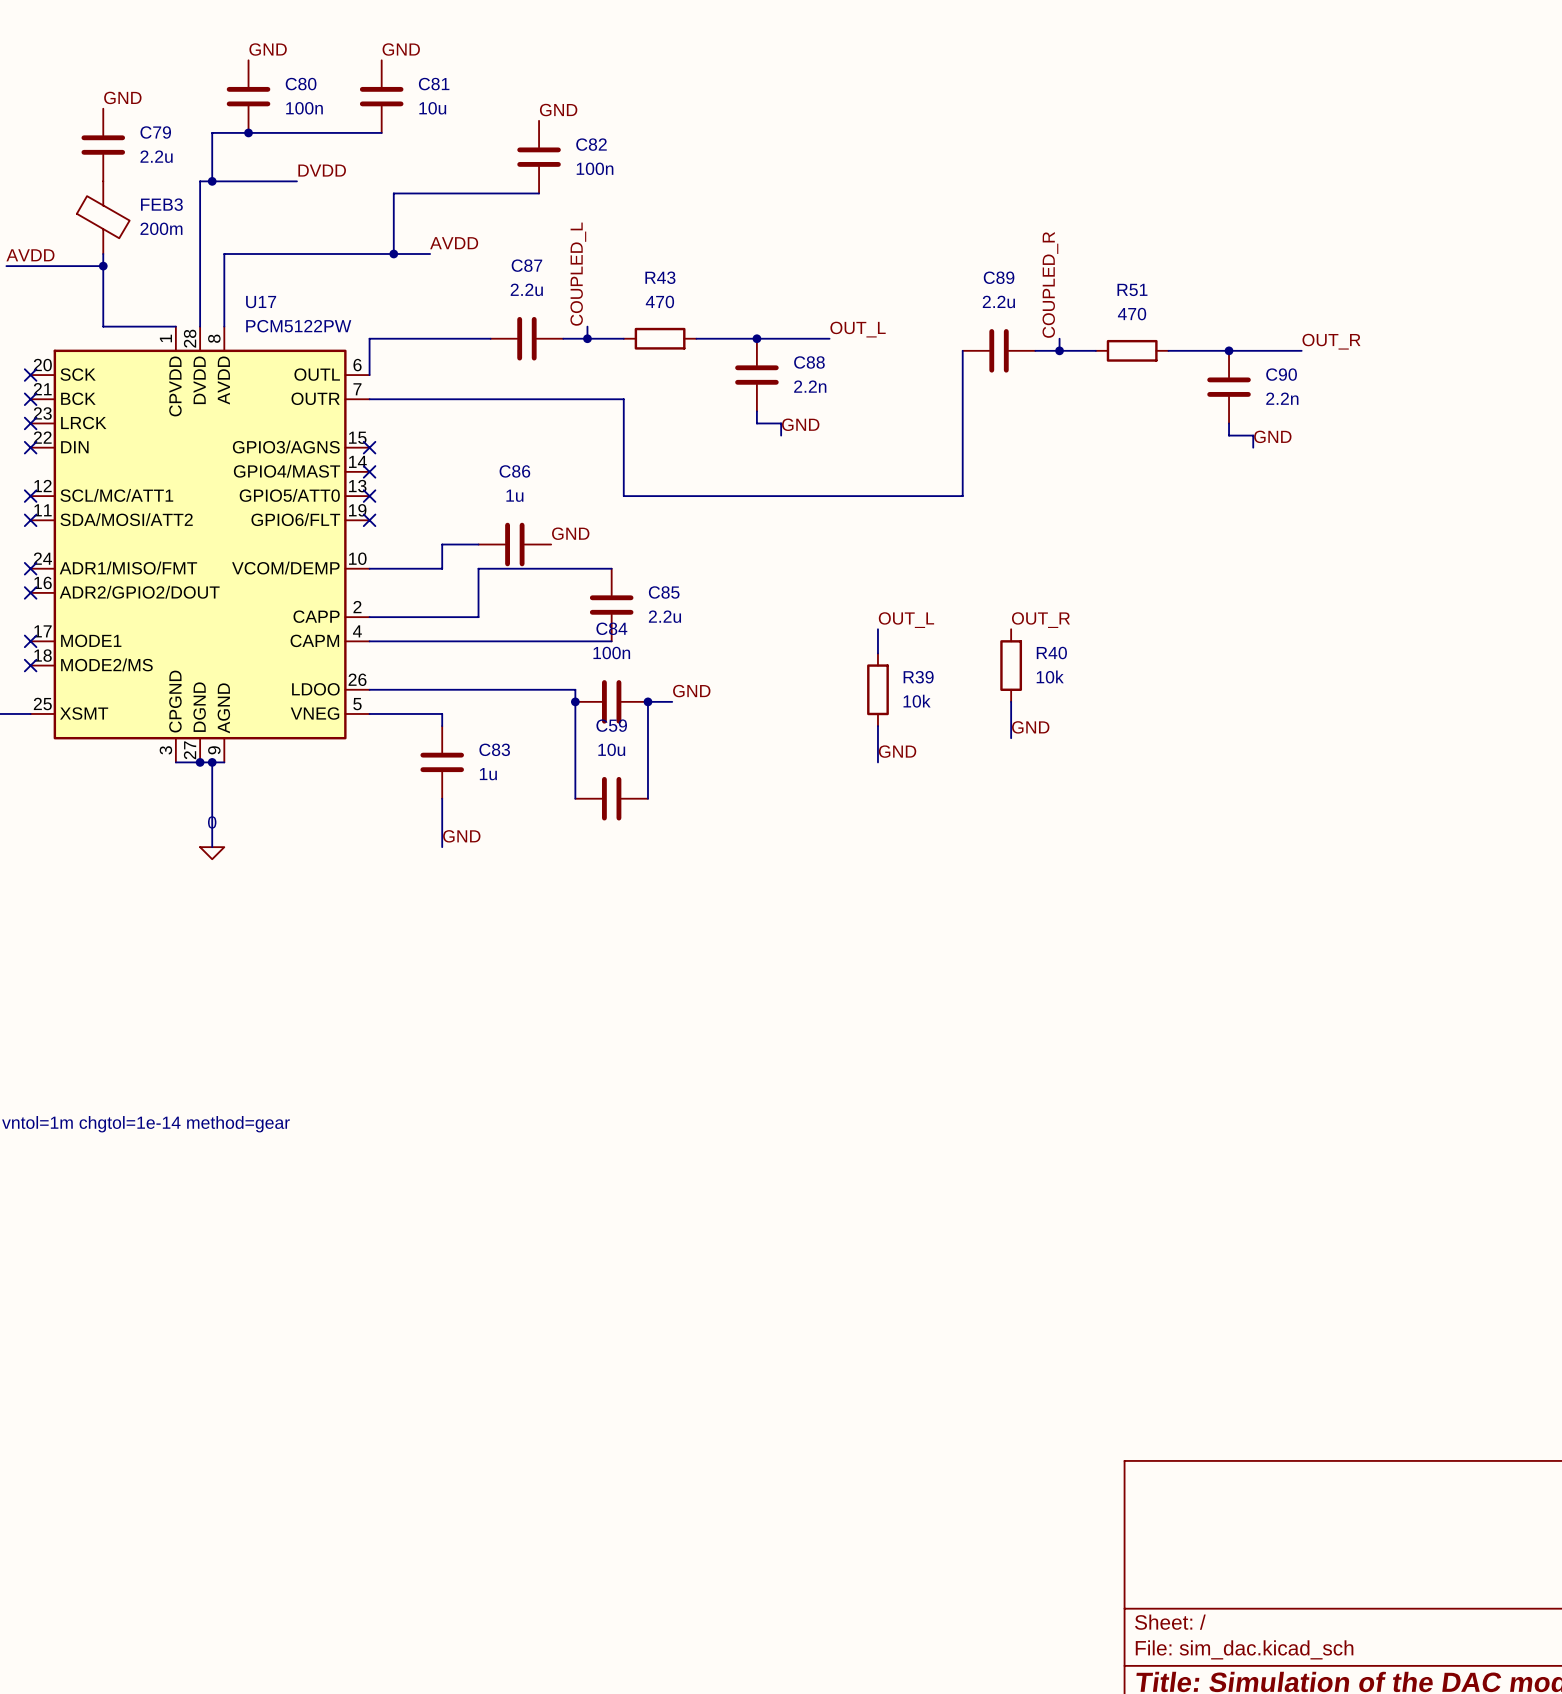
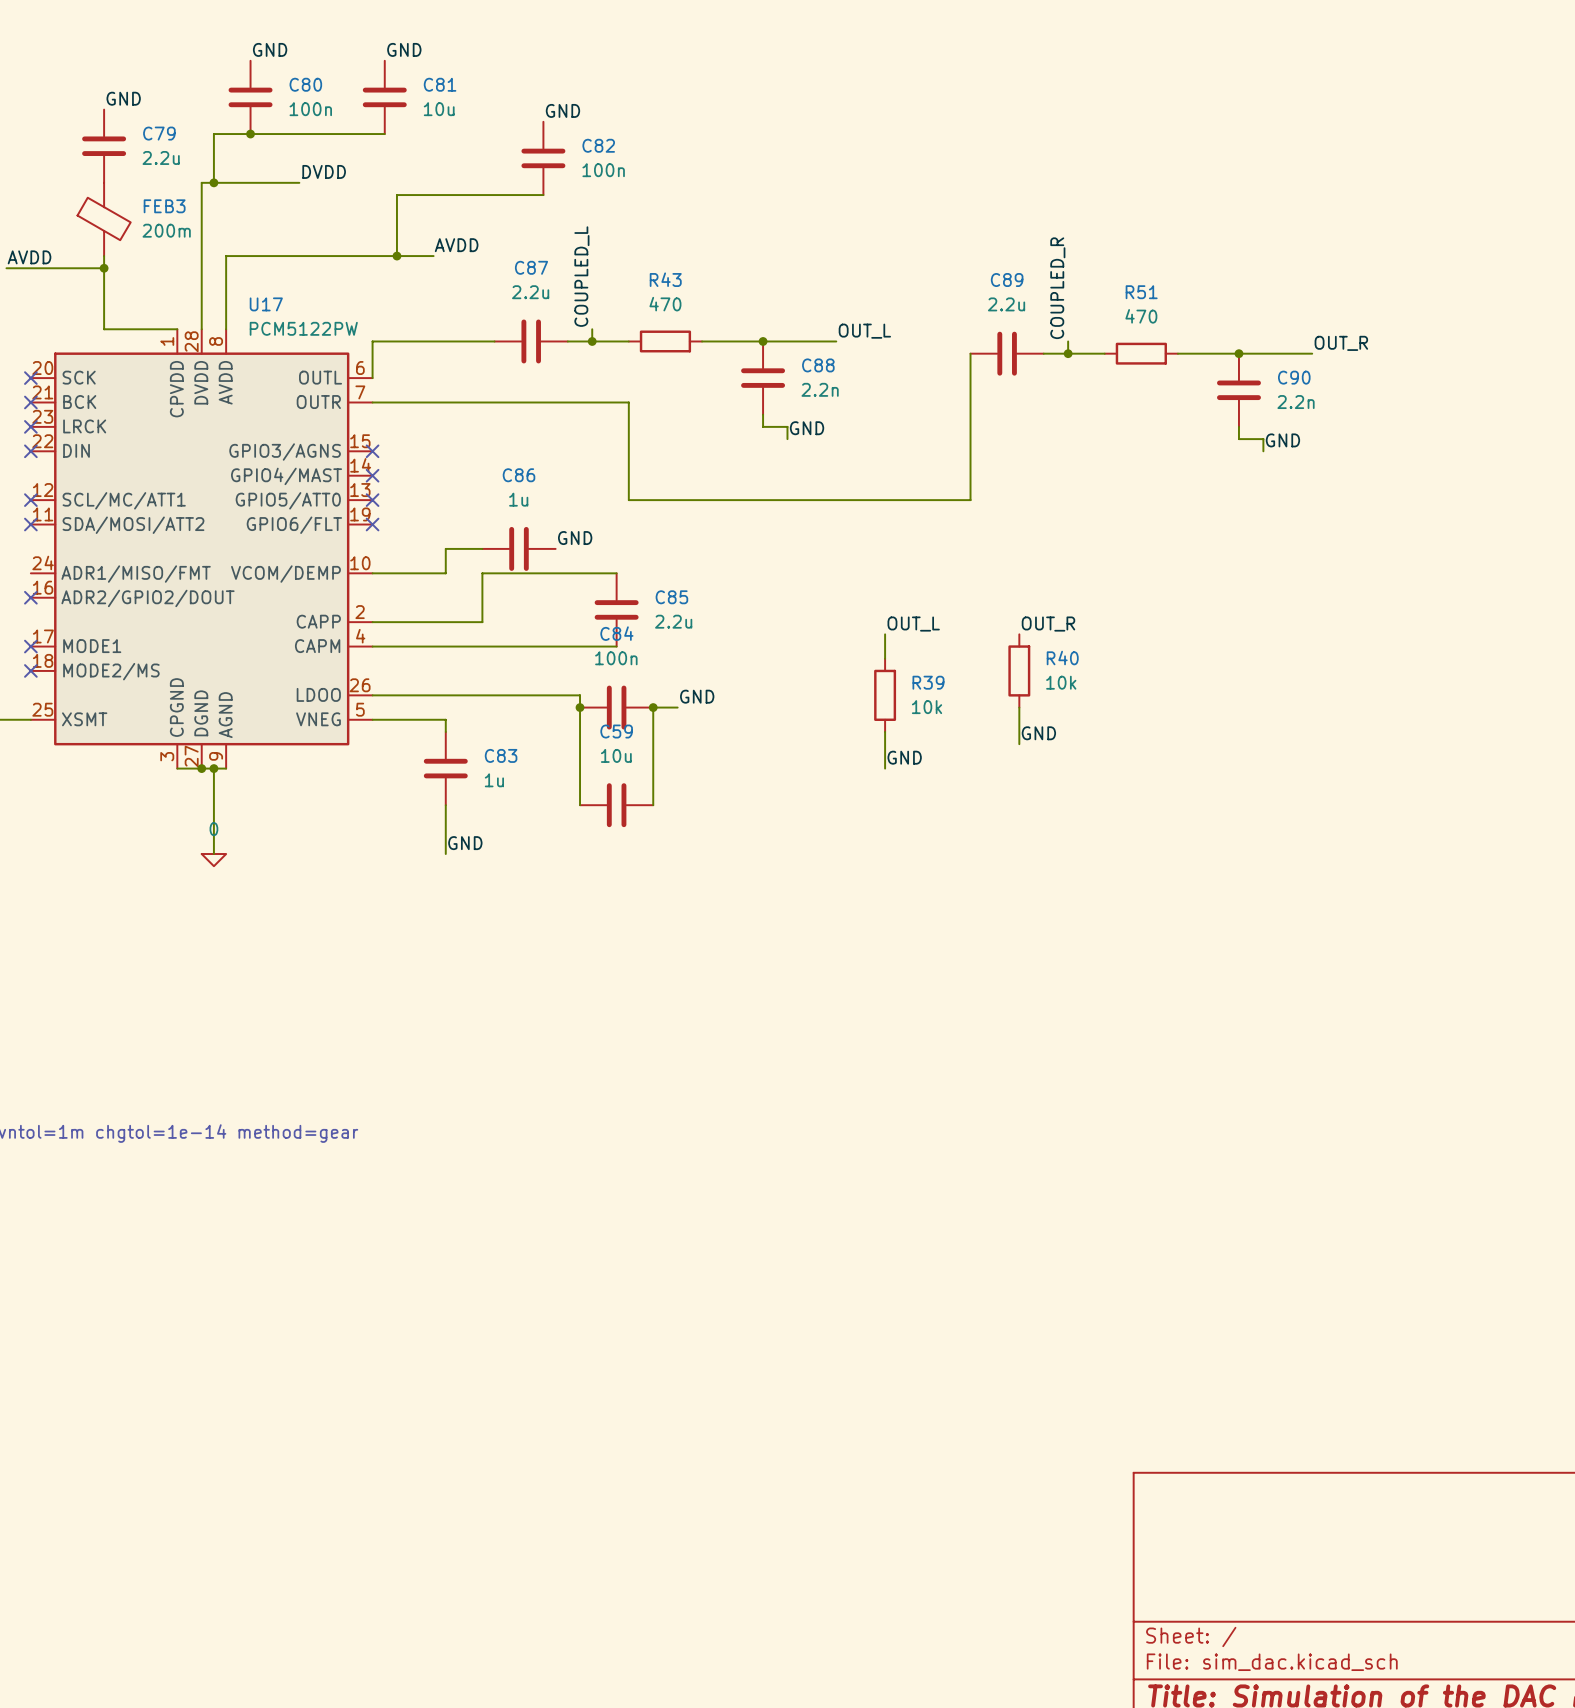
no-connect mark: (30, 568) -> none

